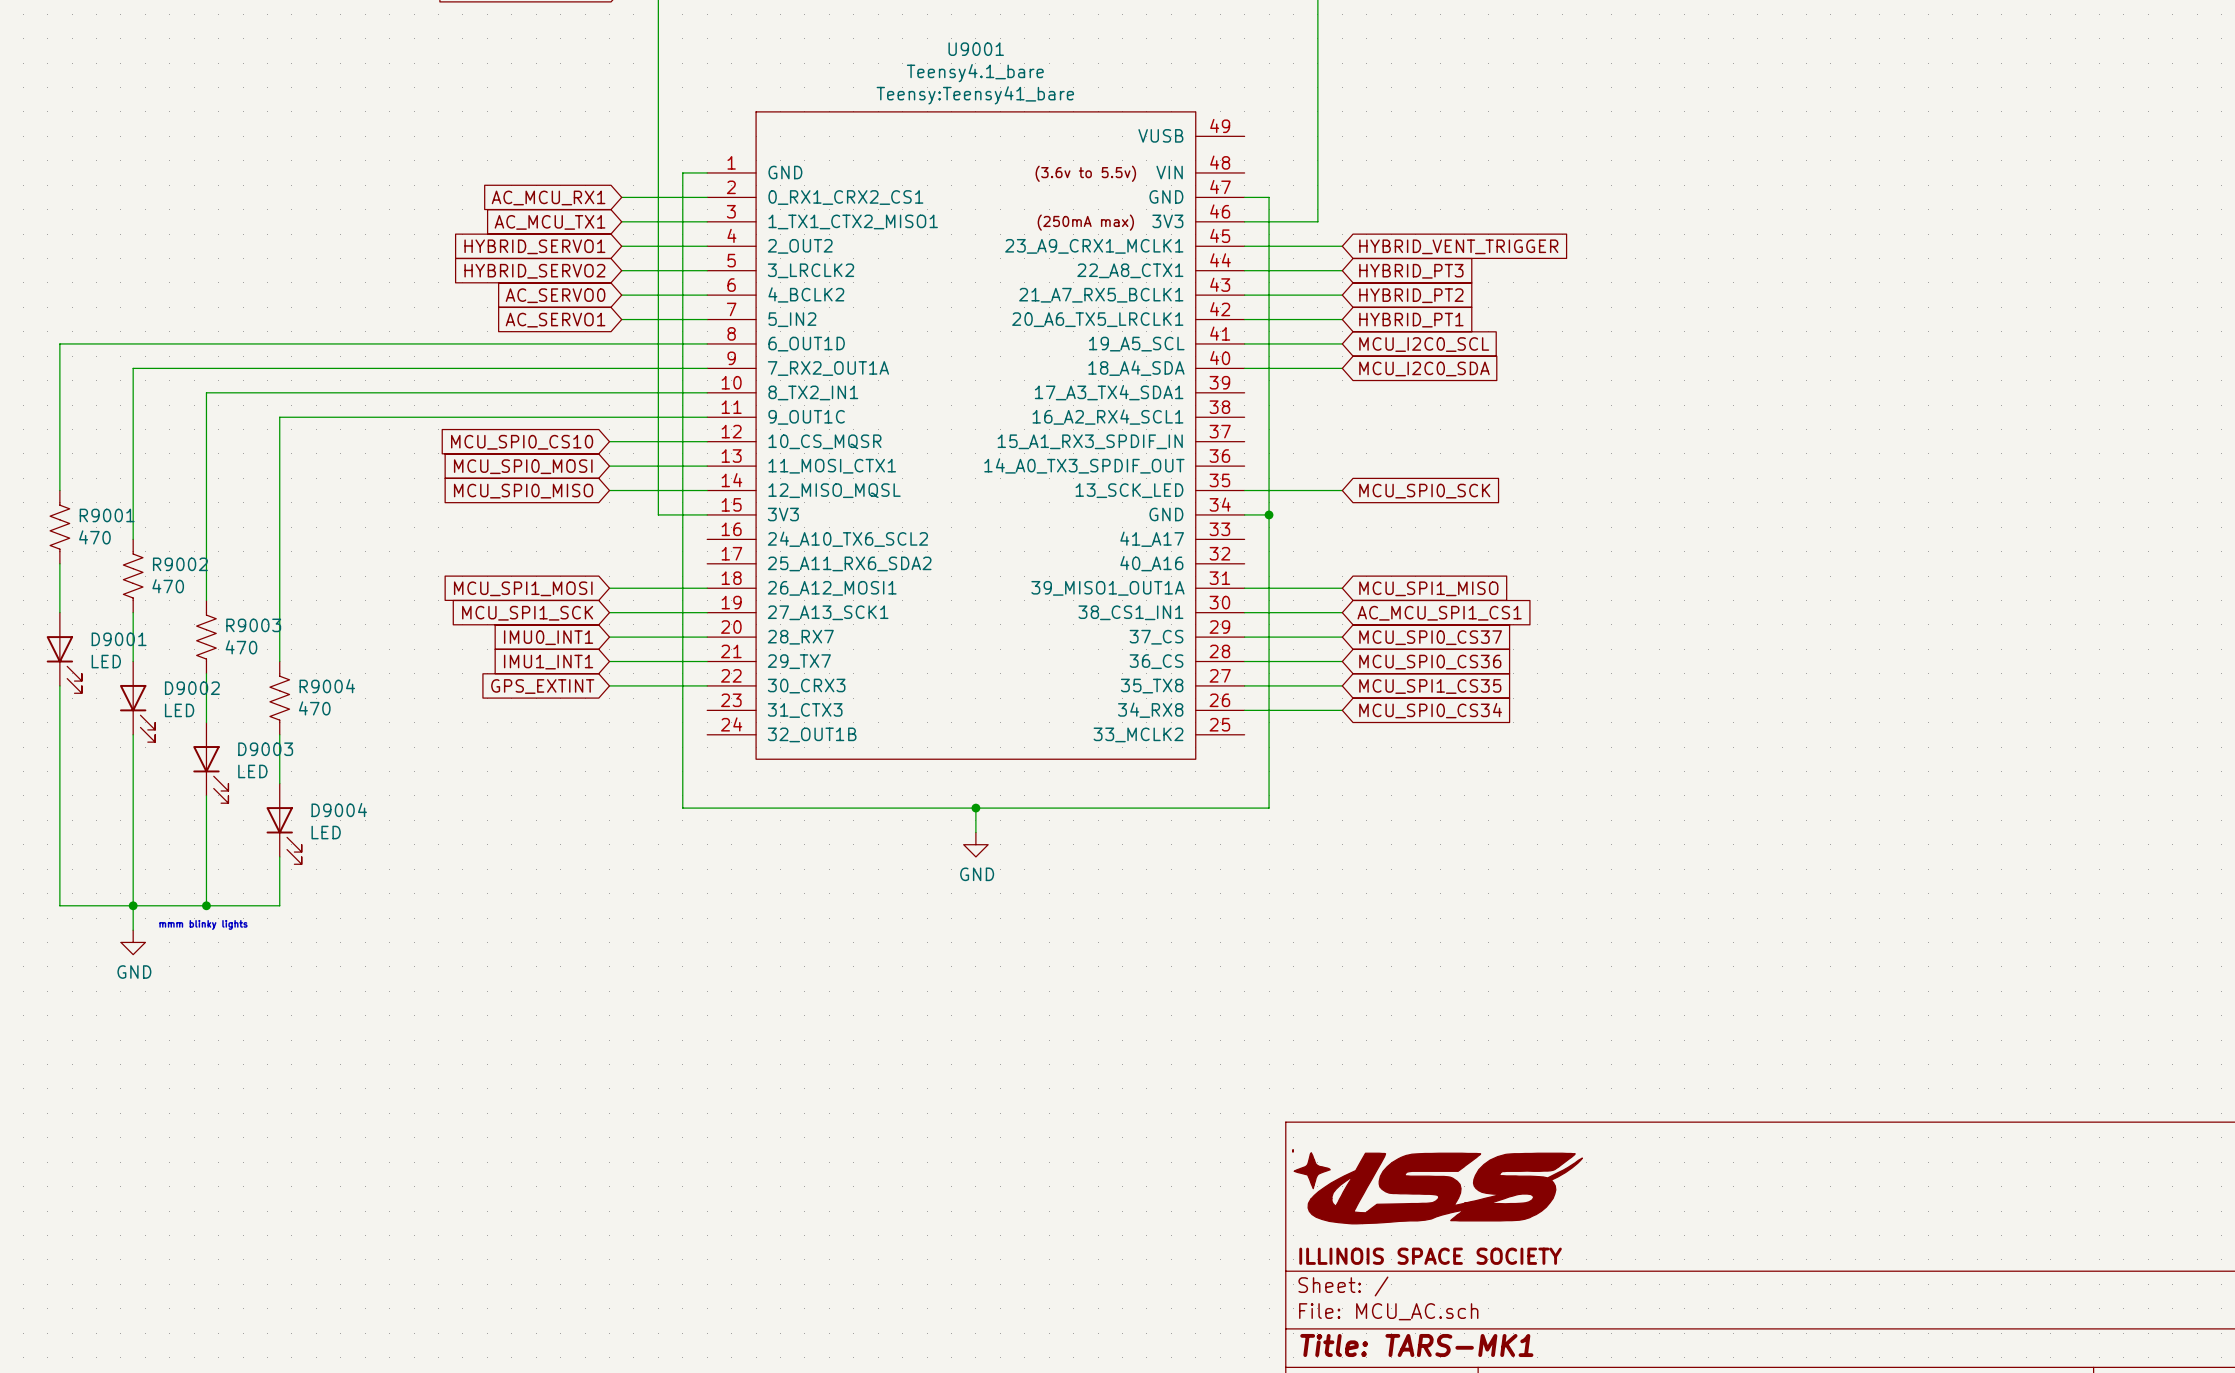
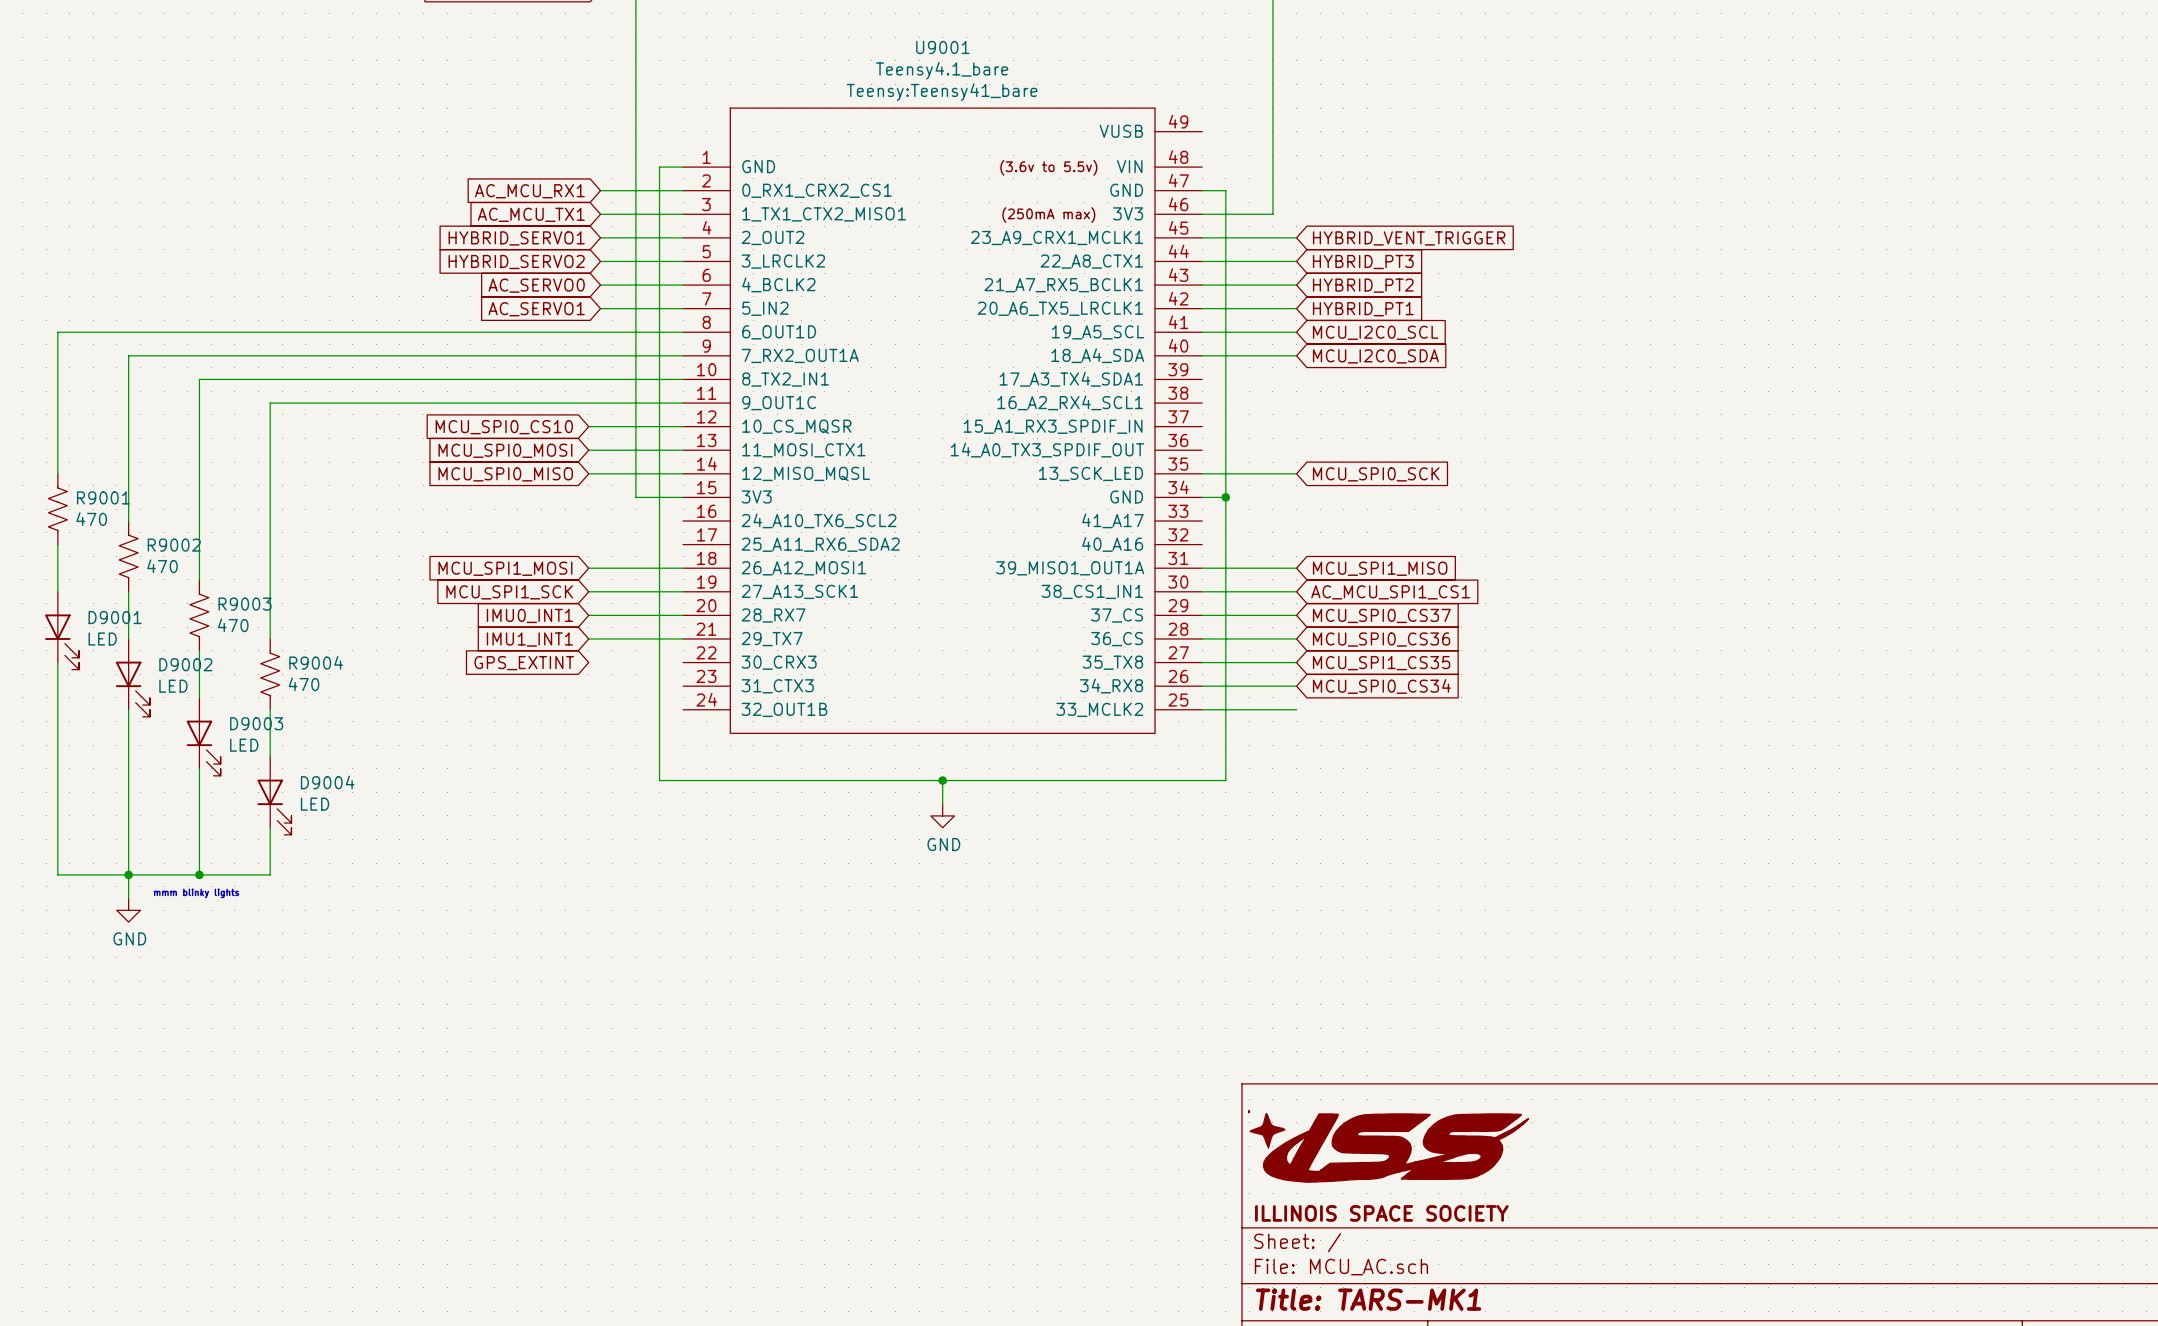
wire: (609, 685) (707, 685) -> none
wire: none -> (1202, 709) (1296, 709)

